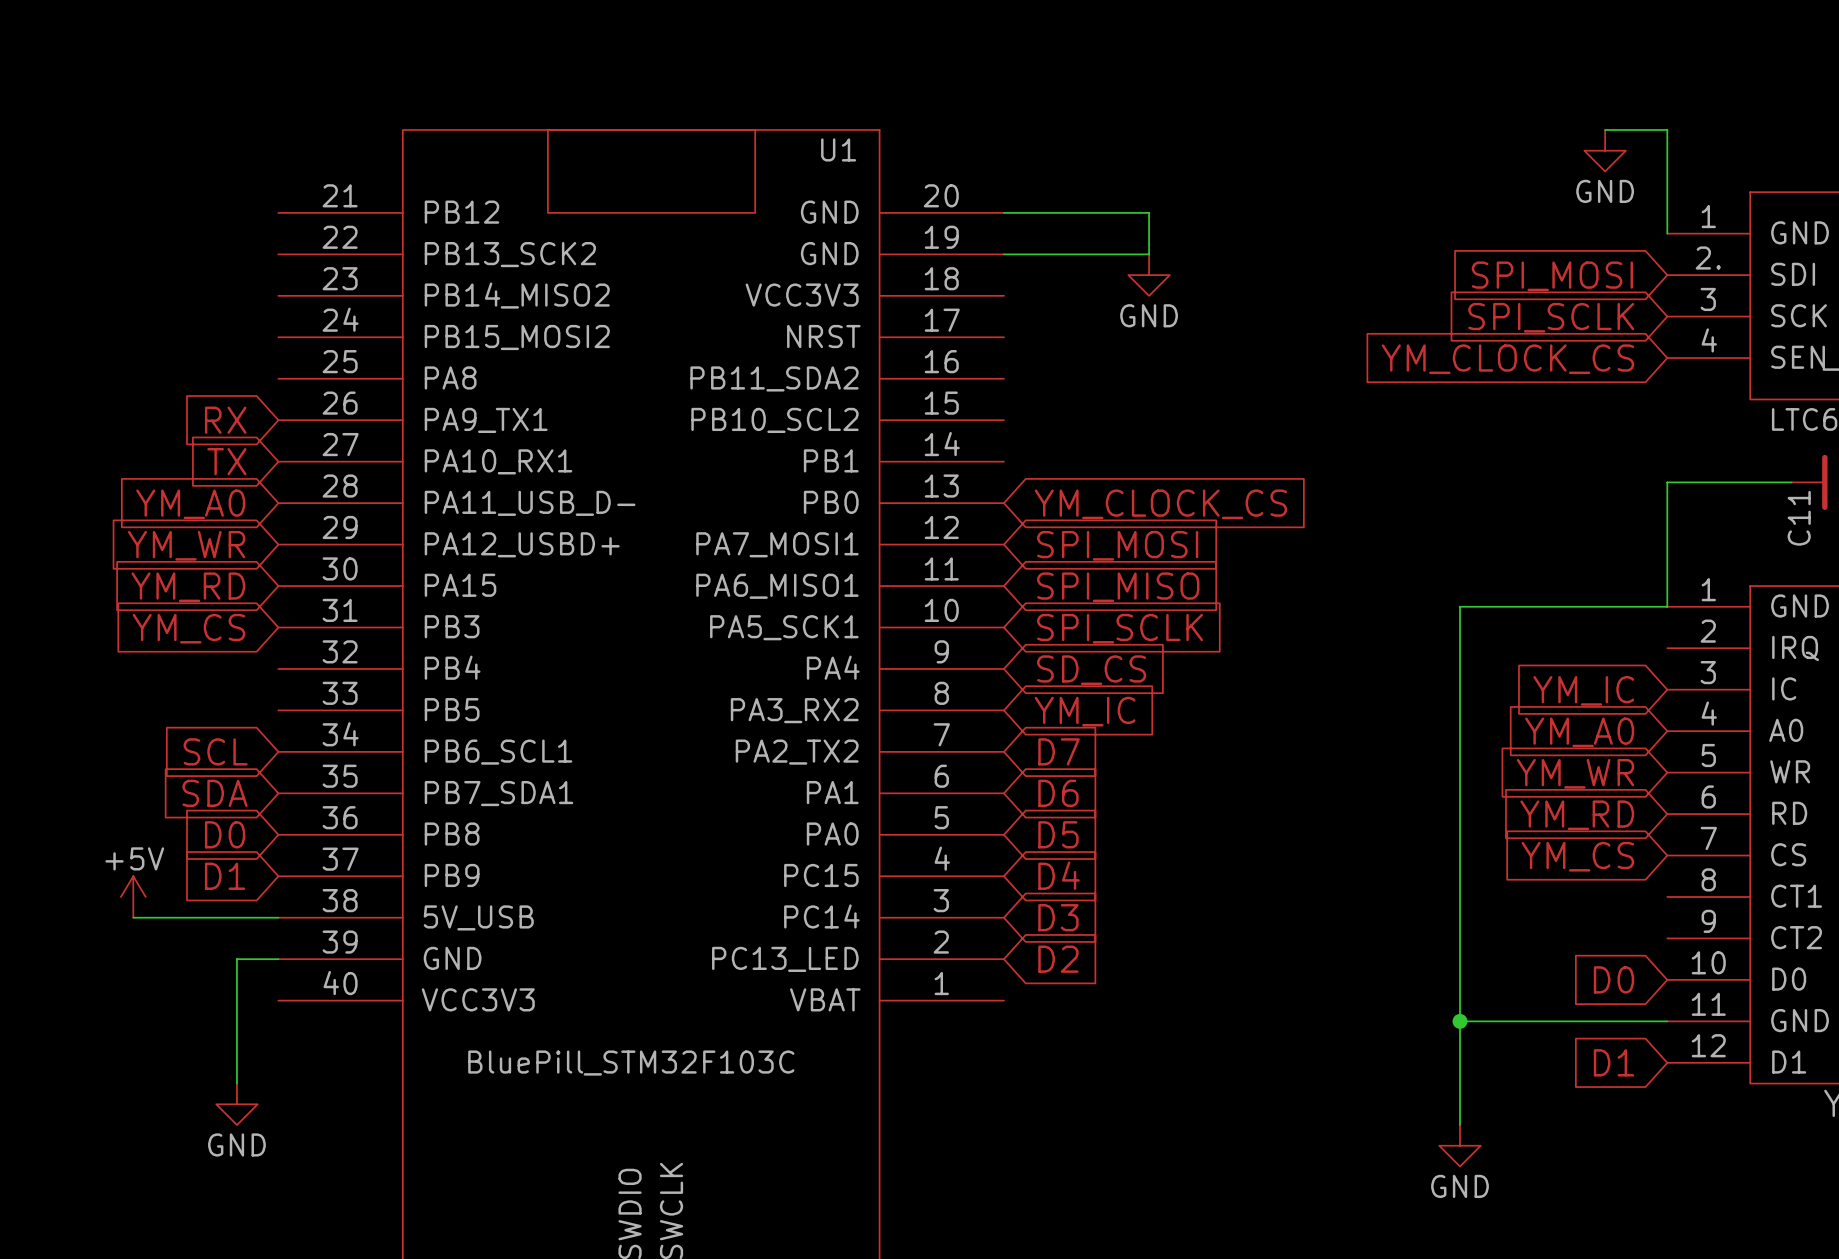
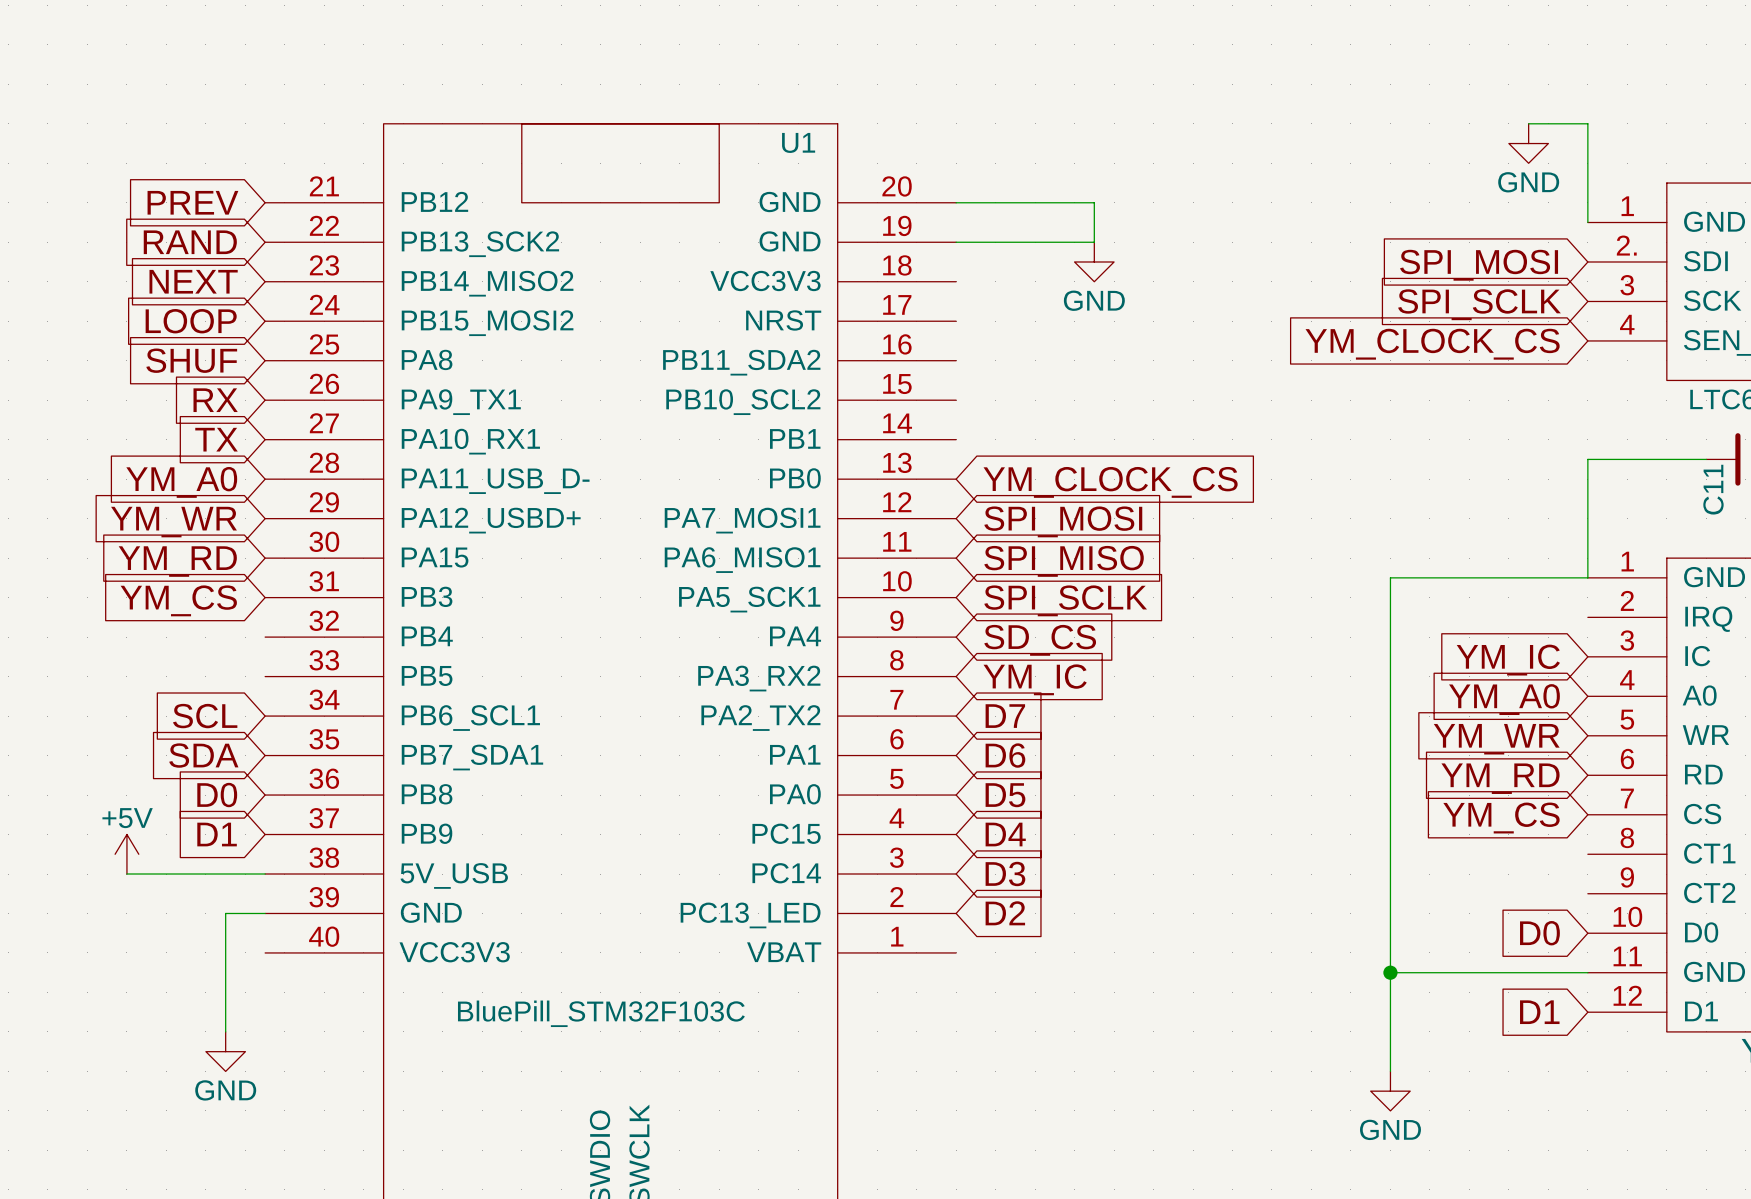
global label: none -> PREV (192, 202)
global label: none -> RAND (190, 242)
global label: none -> NEXT (193, 281)
global label: none -> LOOP (191, 321)
global label: none -> SHUF (191, 360)

